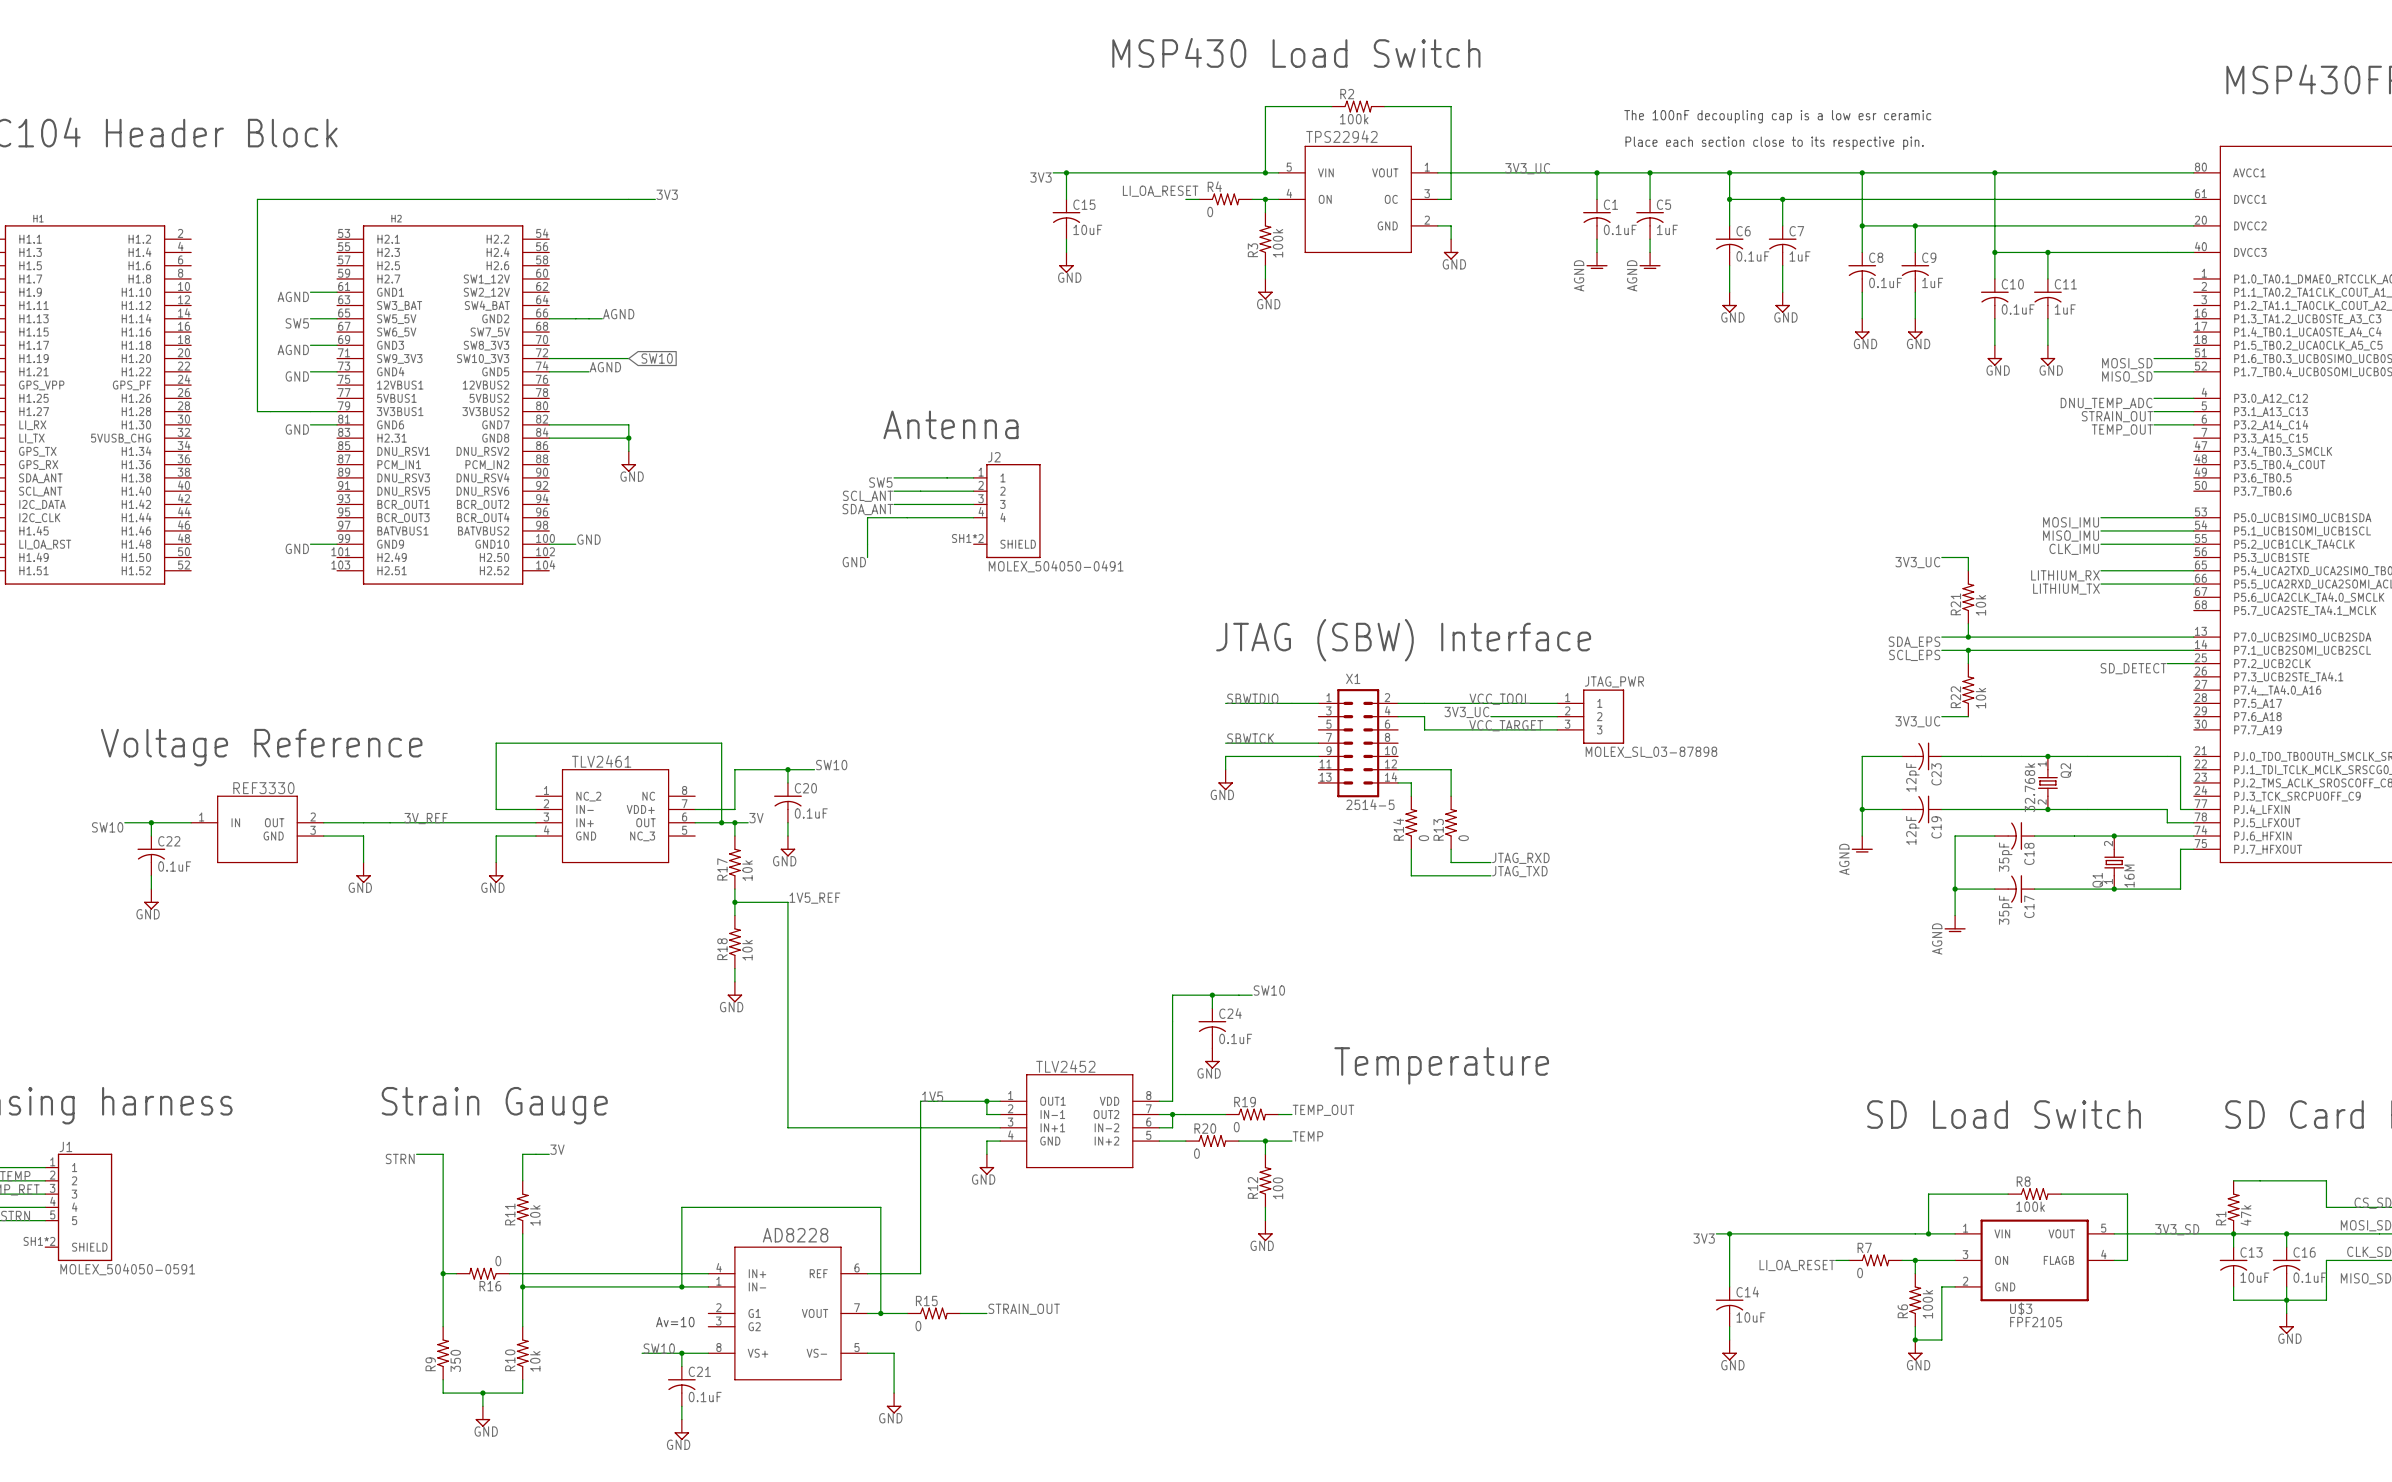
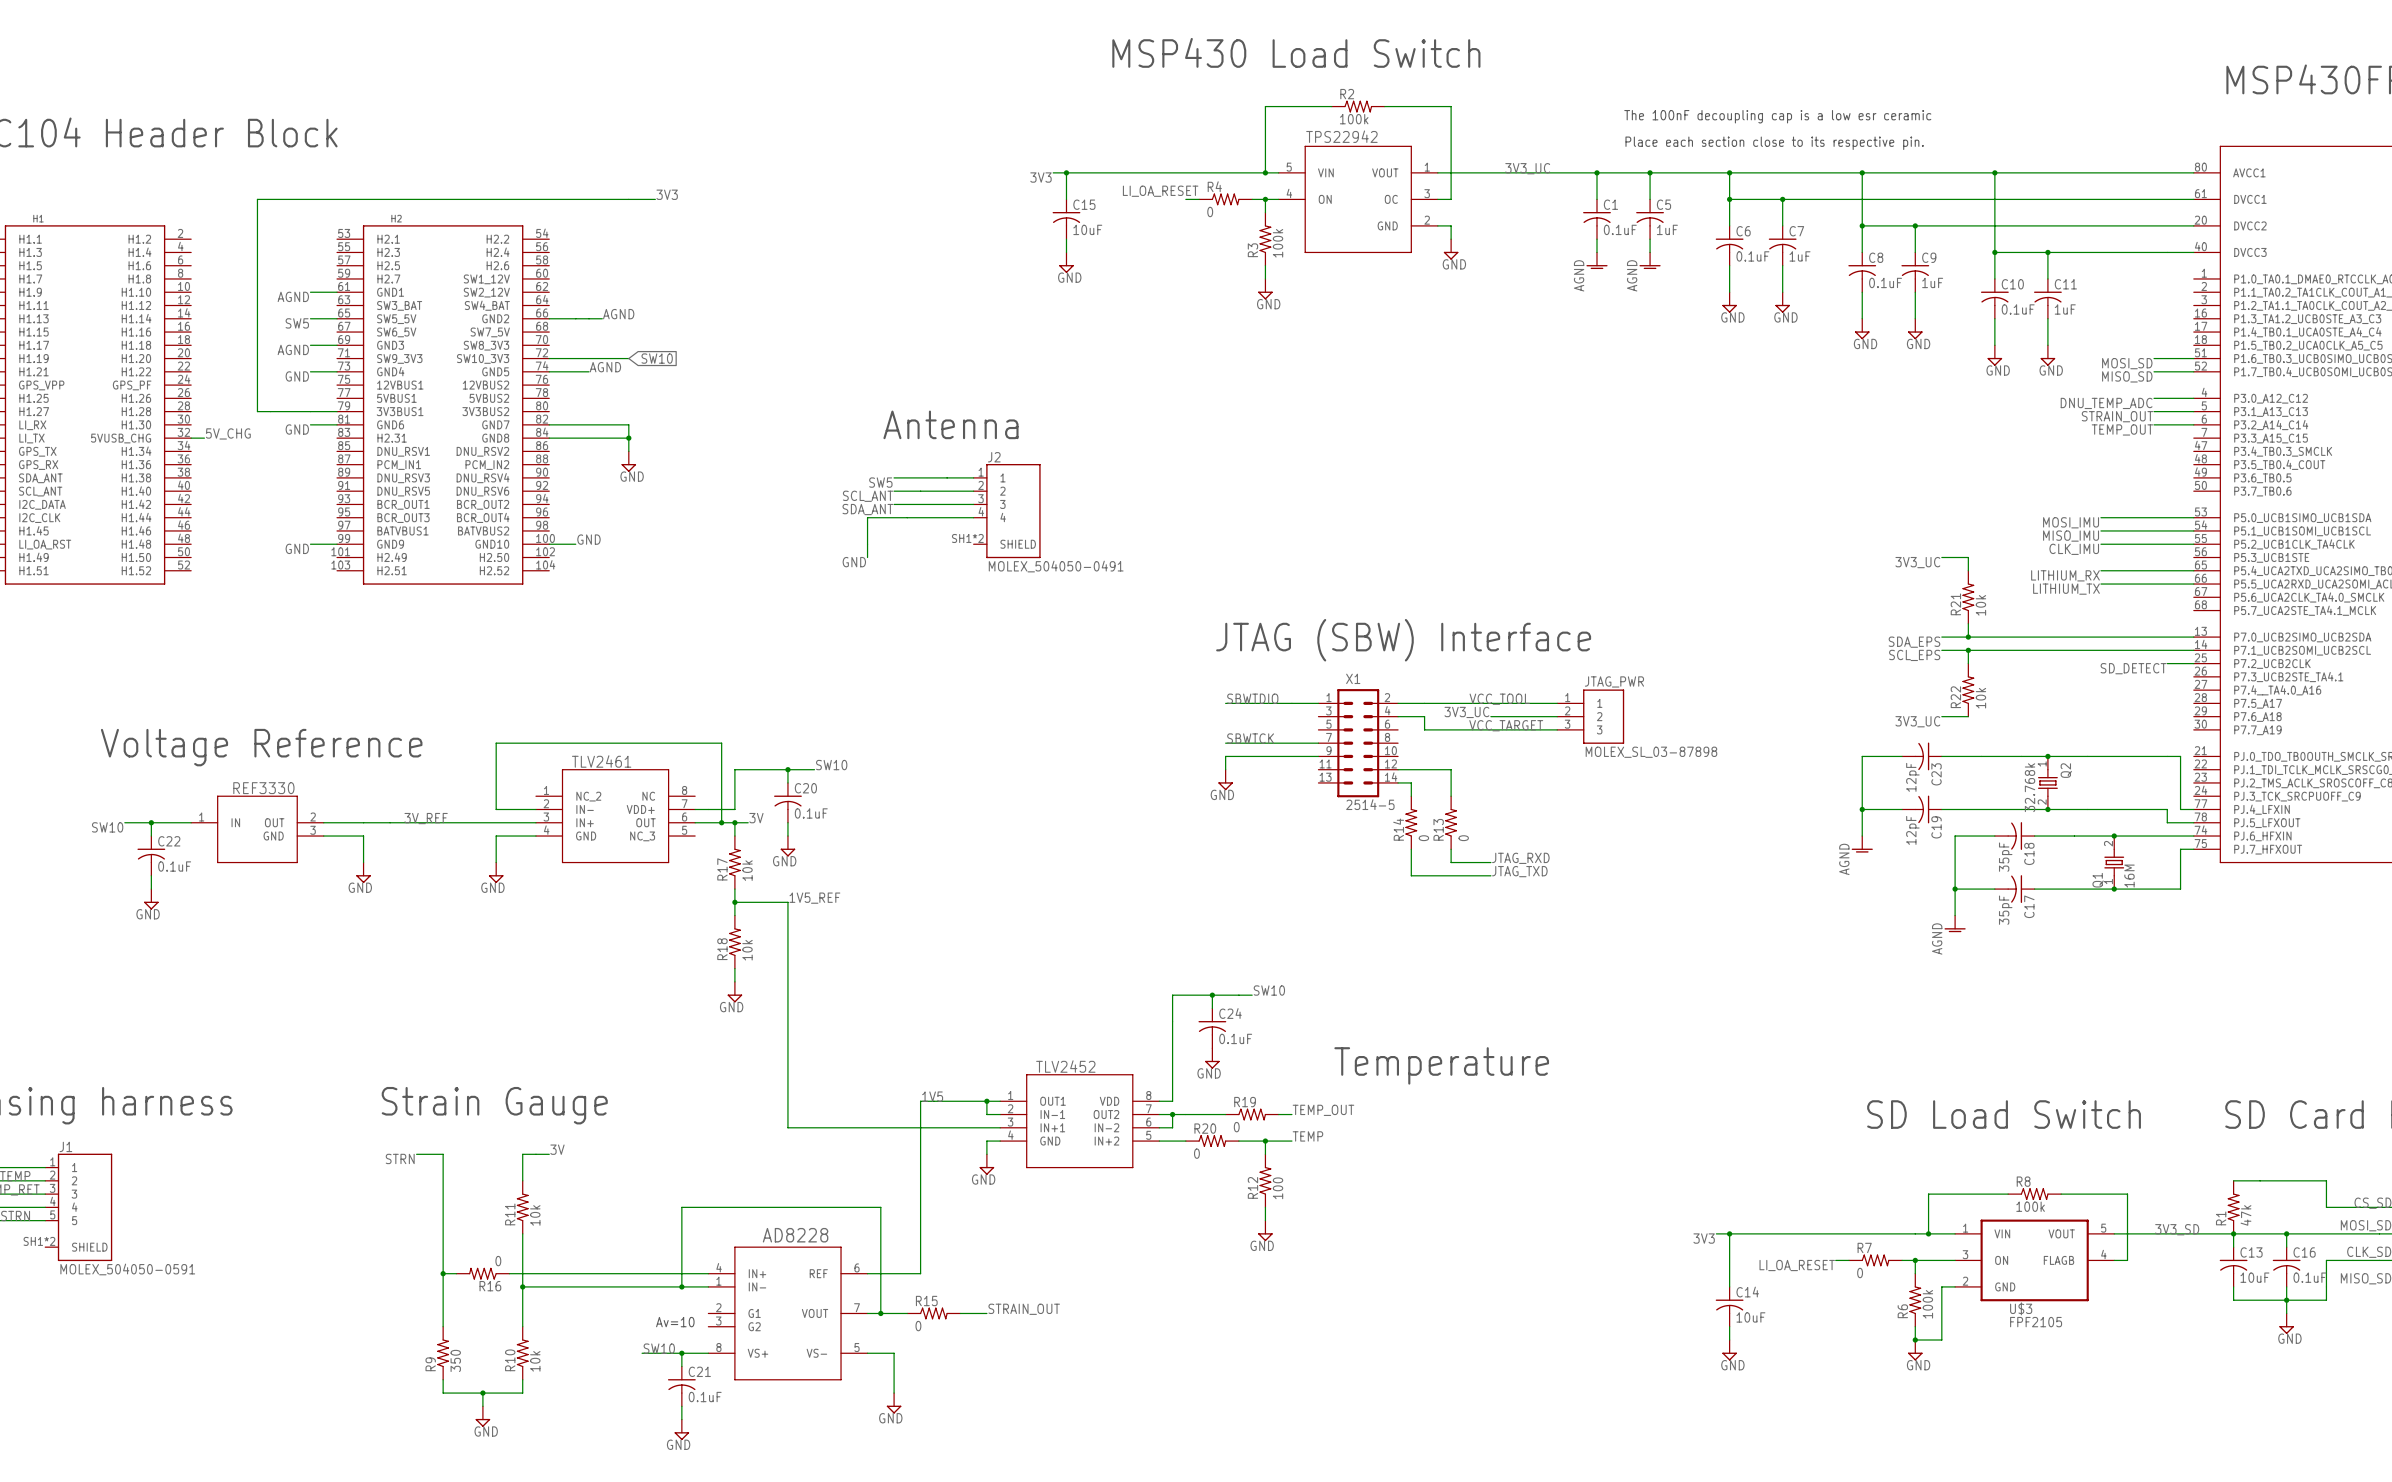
label: none -> 5V_CHG (228, 433)
wire: none -> (191, 438) (204, 438)

